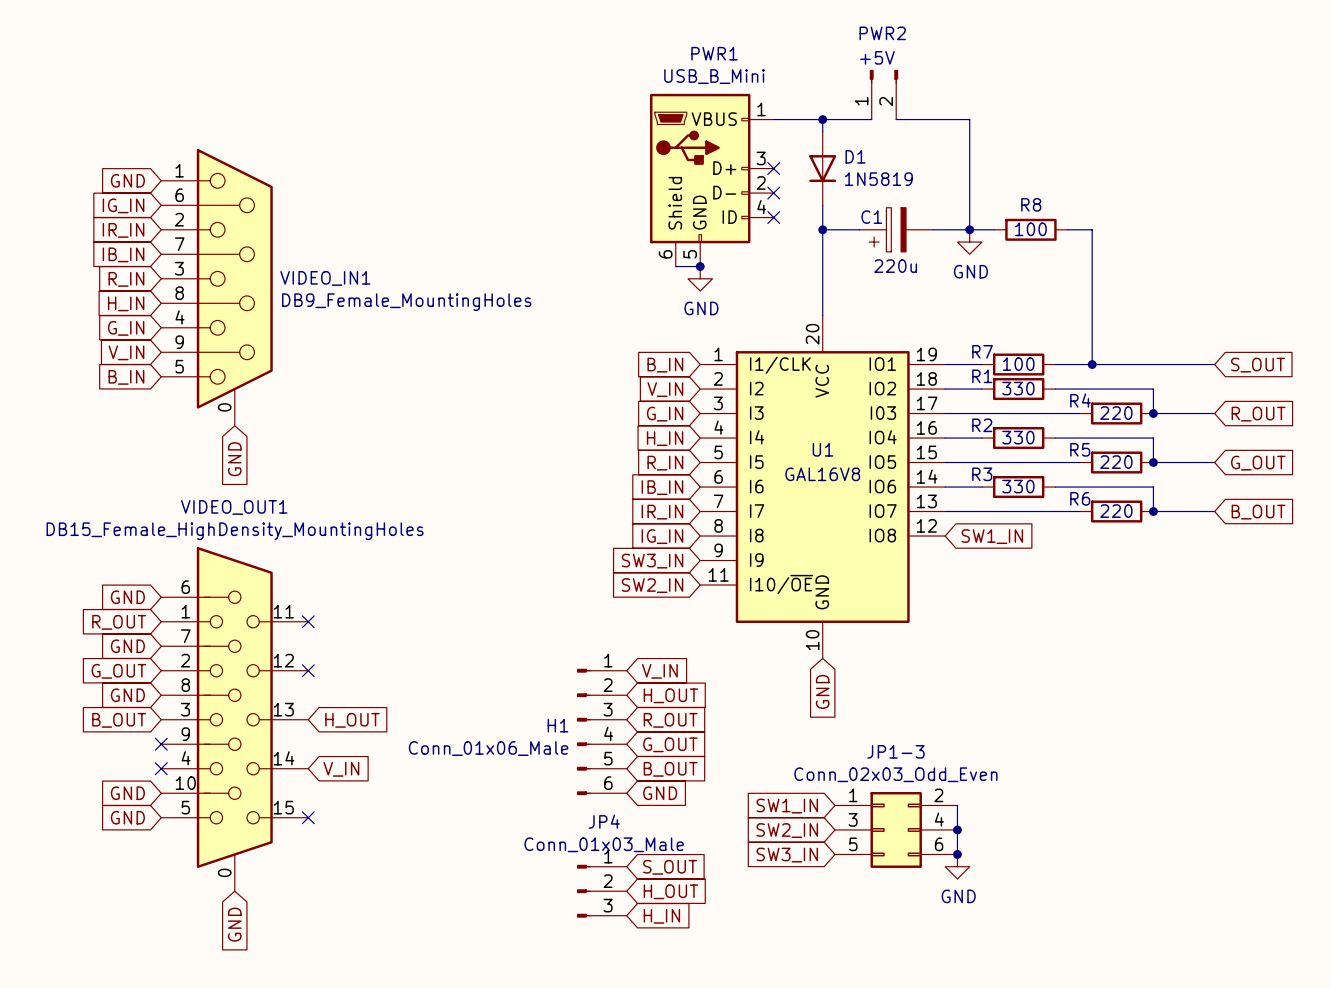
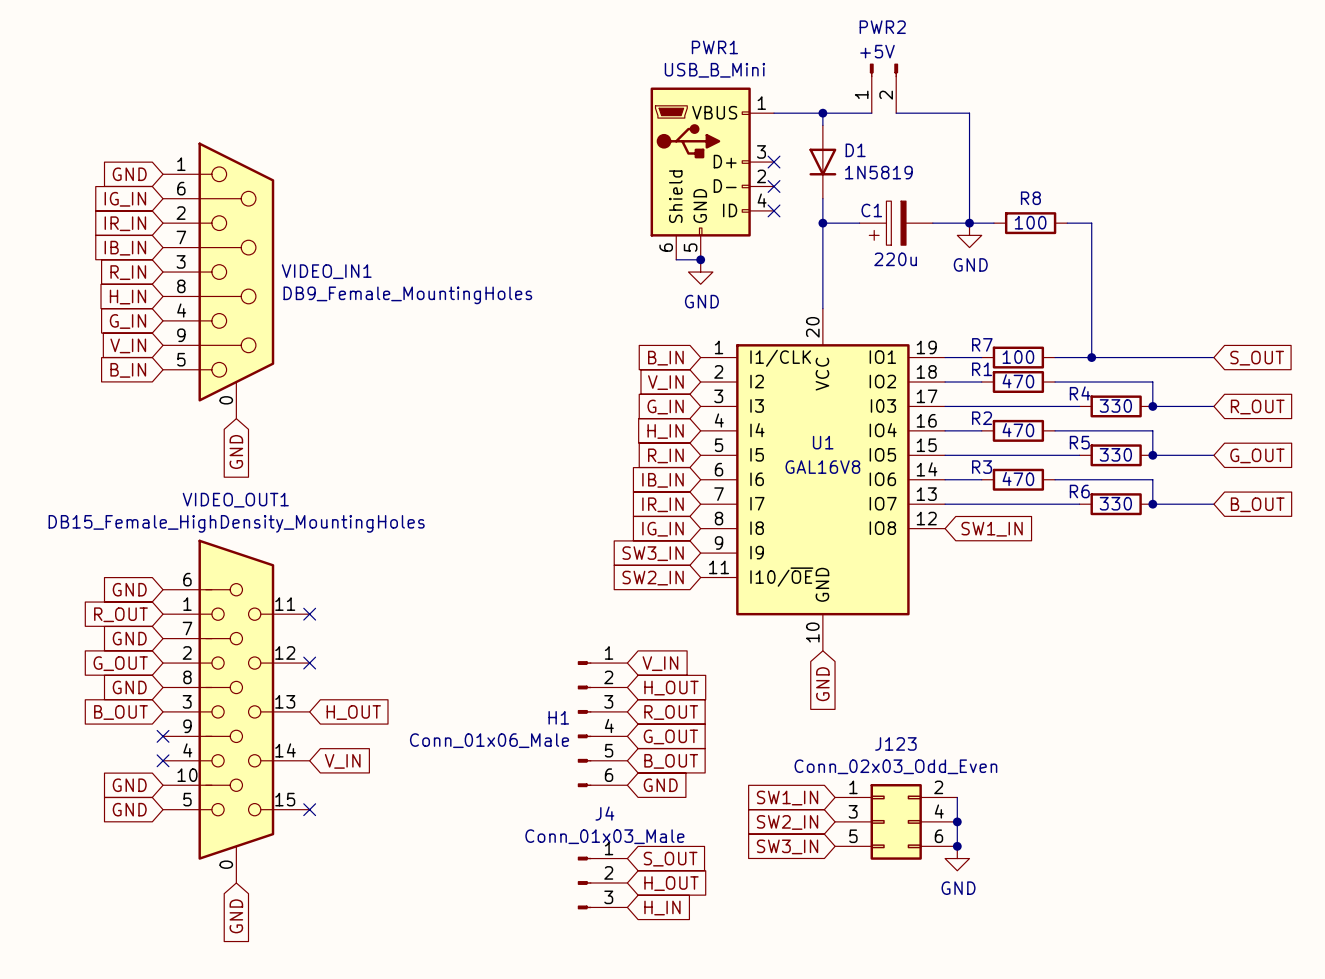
R1 value: 330 (1018, 388) -> 470 (1018, 381)
R4 value: 220 (1116, 413) -> 330 (1115, 405)
R2 value: 330 (1018, 437) -> 470 (1018, 430)
R5 value: 220 (1116, 462) -> 330 (1115, 454)
R3 value: 330 (1018, 486) -> 470 (1018, 479)
R6 value: 220 (1116, 511) -> 330 (1115, 503)
JP1-3 name: JP1-3 (895, 751) -> J123 (895, 743)
JP4 name: JP4 (604, 821) -> J4 (604, 813)

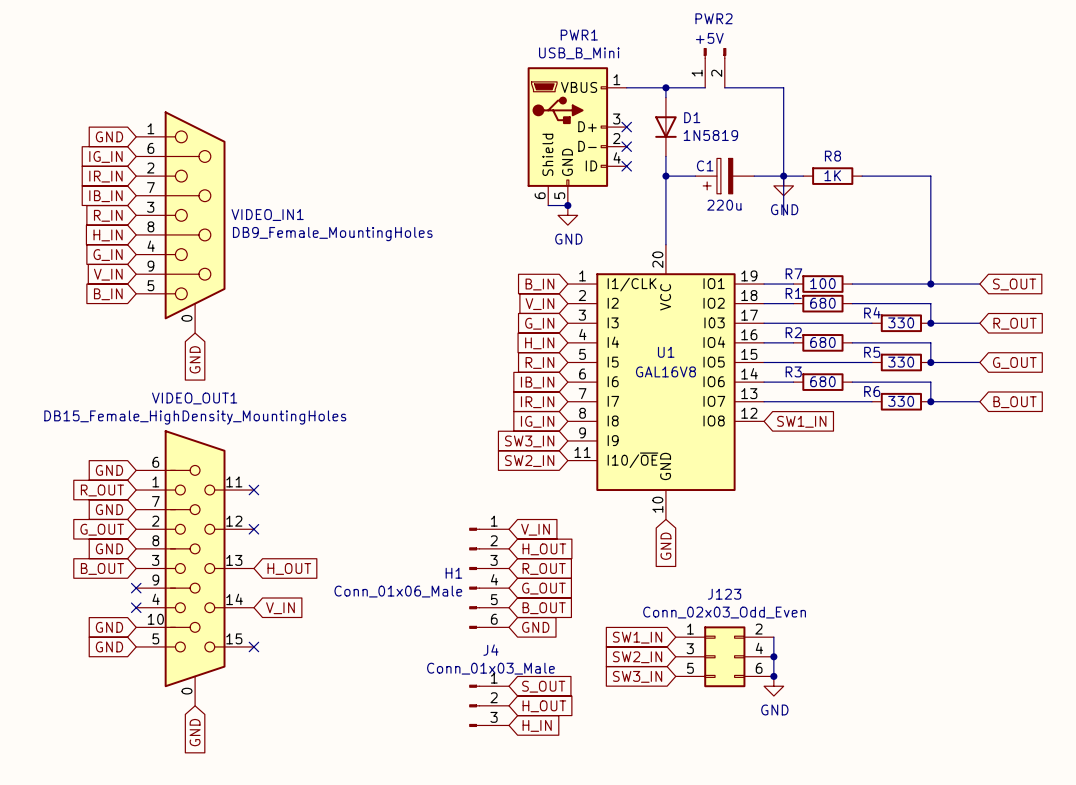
R8 value: 100 (1030, 222) -> 1K (832, 175)
wire: none -> (783, 176) (783, 215)
wire: (1091, 223) (1091, 357) -> (881, 176) (930, 176) (930, 284)
junction: (1091, 357) -> none
junction: none -> (930, 284)
R1 value: 470 (1018, 381) -> 680 (822, 303)
R2 value: 470 (1018, 430) -> 680 (822, 342)
R3 value: 470 (1018, 479) -> 680 (822, 381)

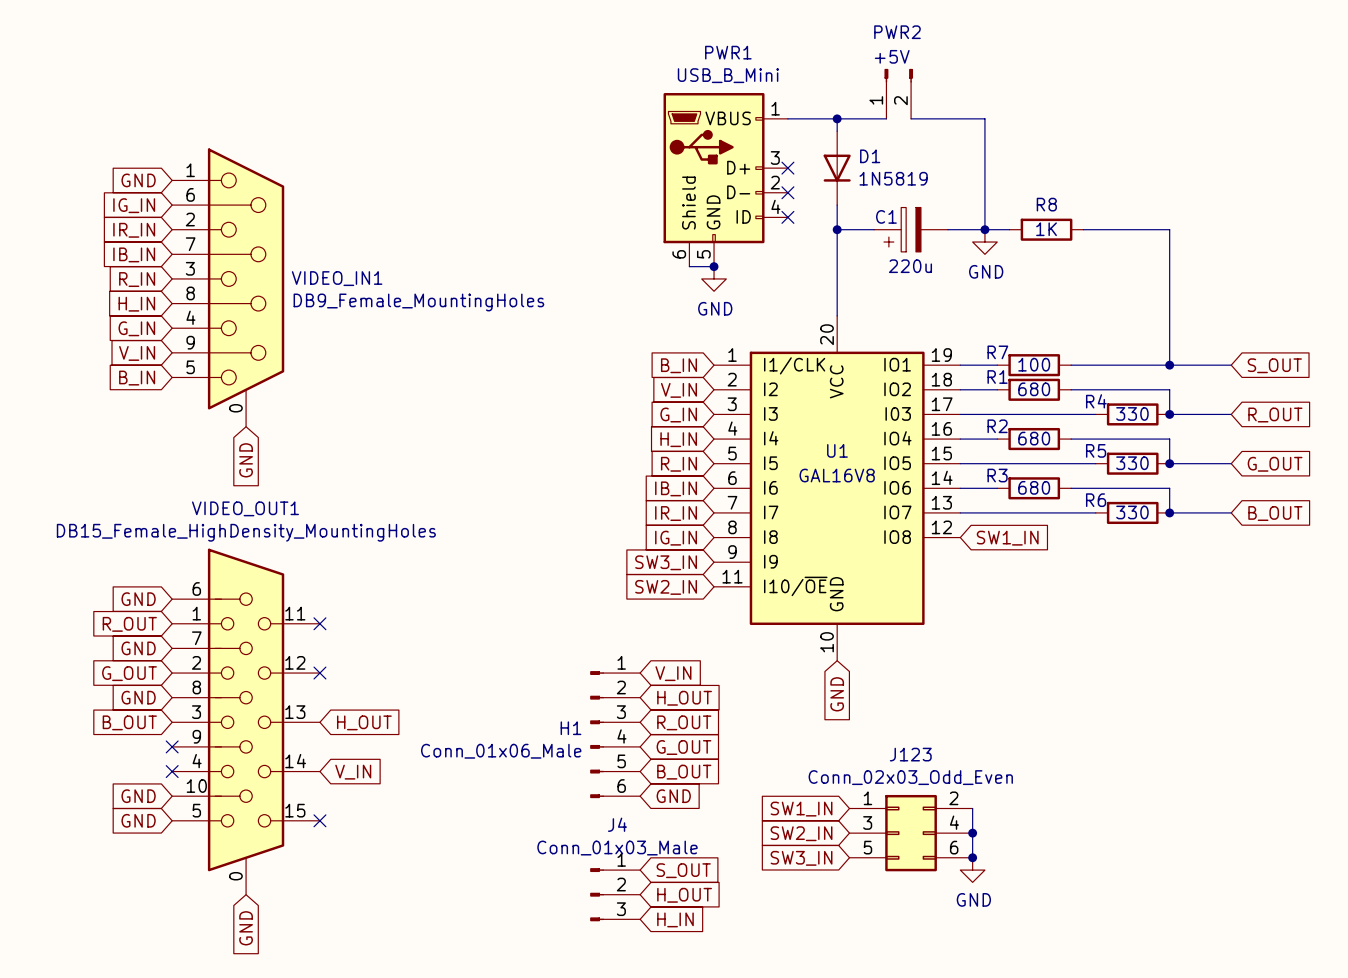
wire: (783, 176) (783, 215) -> none

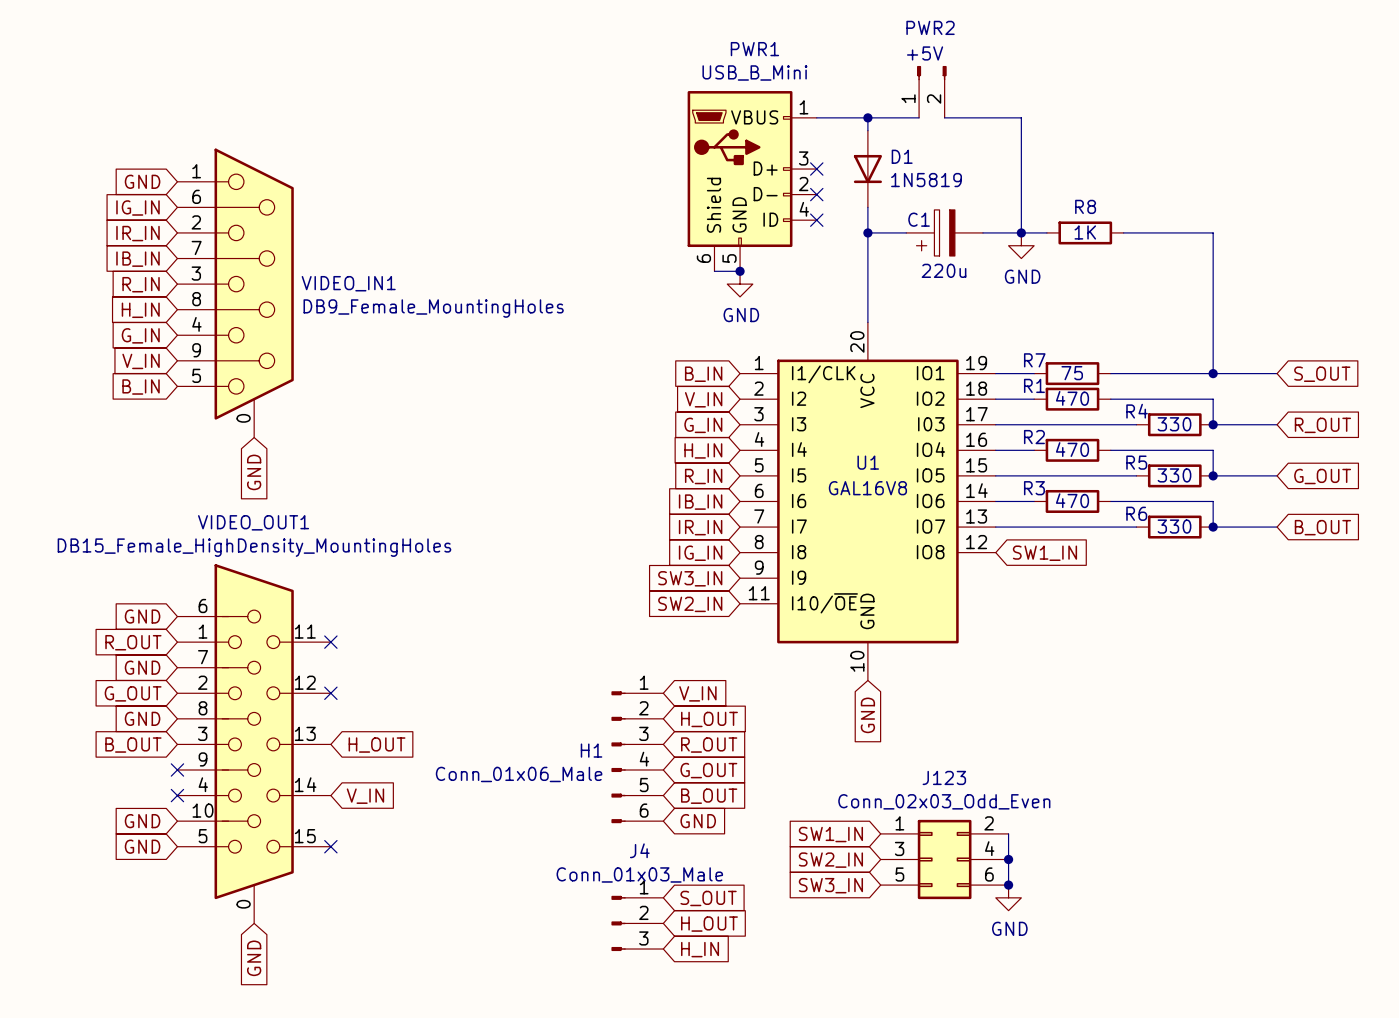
R7 value: 100 (1034, 364) -> 75 (1072, 373)
R1 value: 680 (1034, 389) -> 470 (1072, 398)
R2 value: 680 (1034, 438) -> 470 (1072, 449)
R3 value: 680 (1034, 487) -> 470 (1072, 500)

